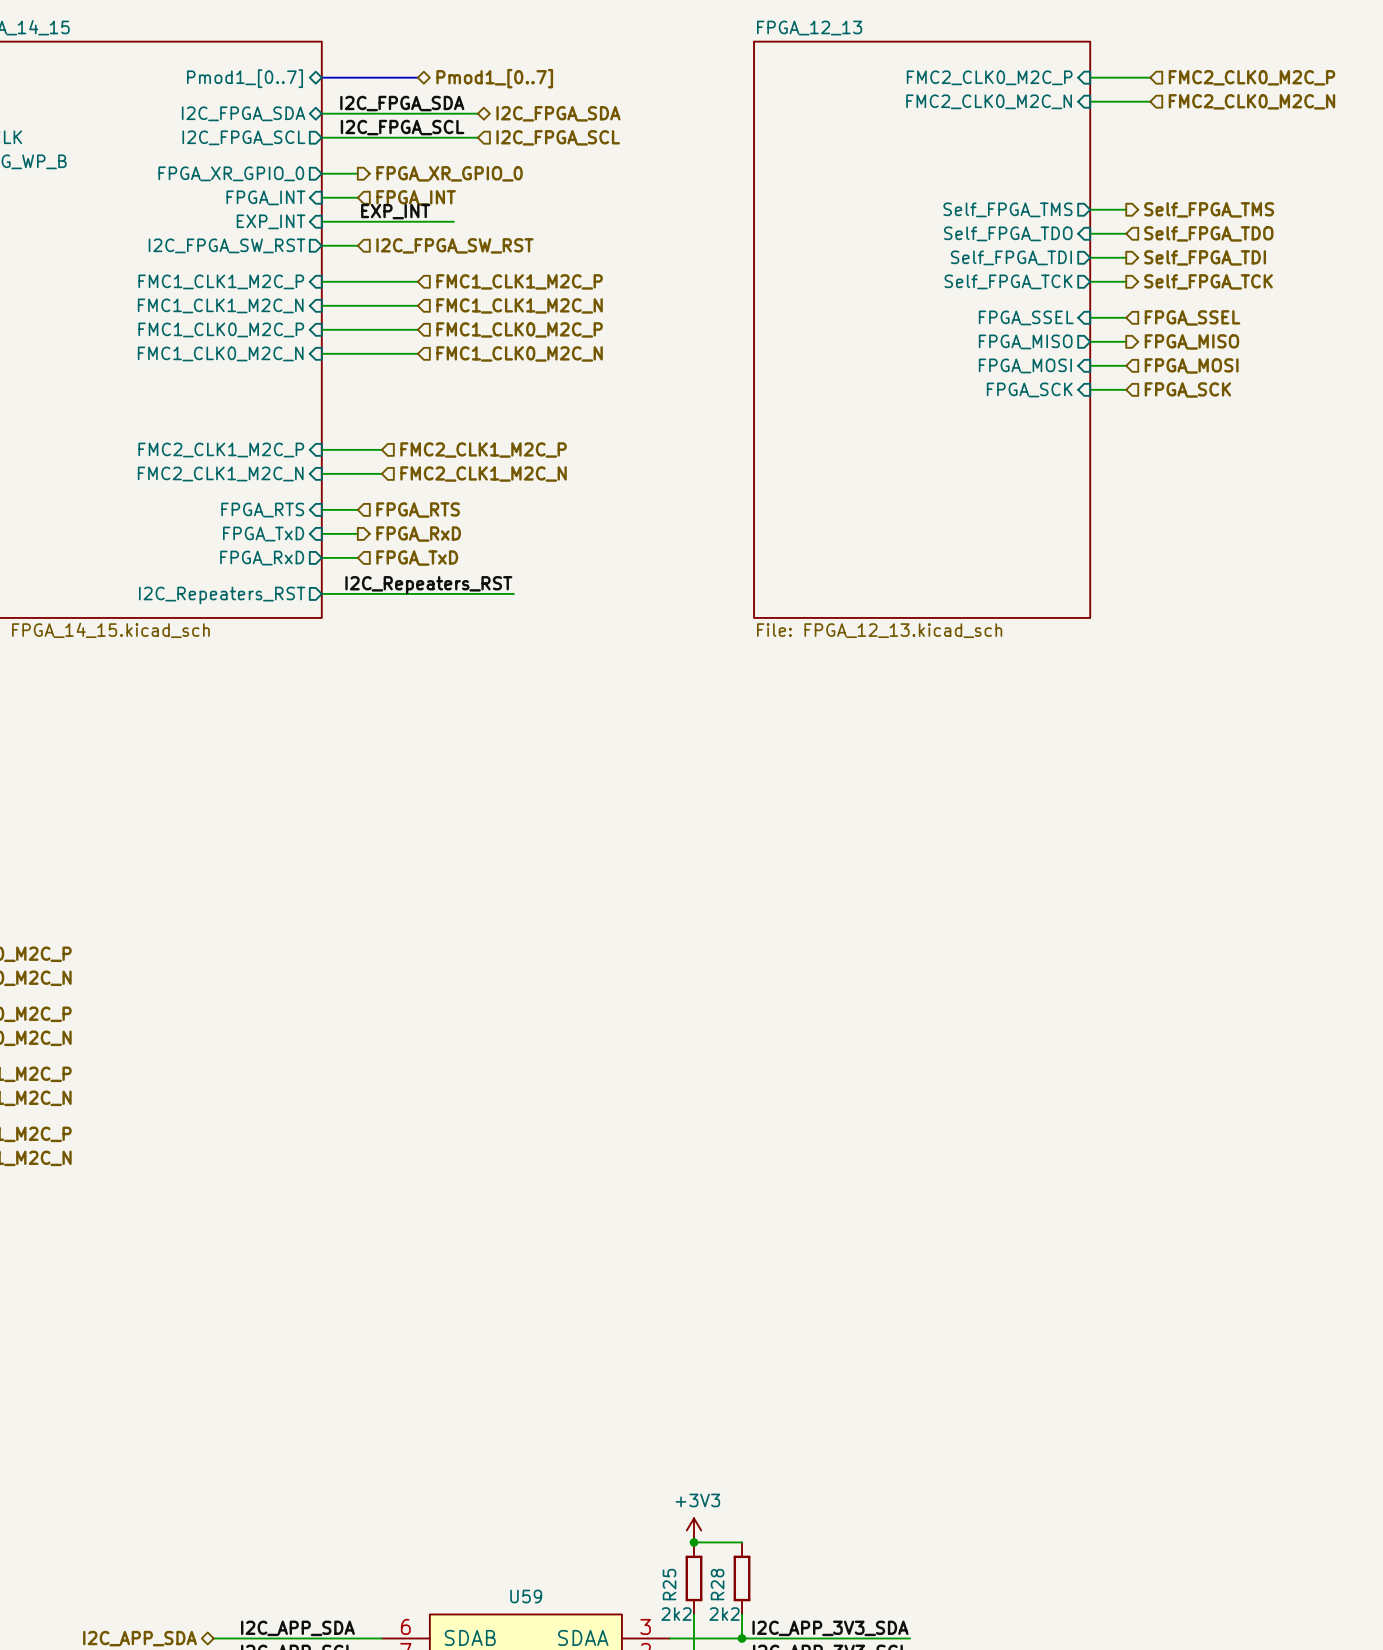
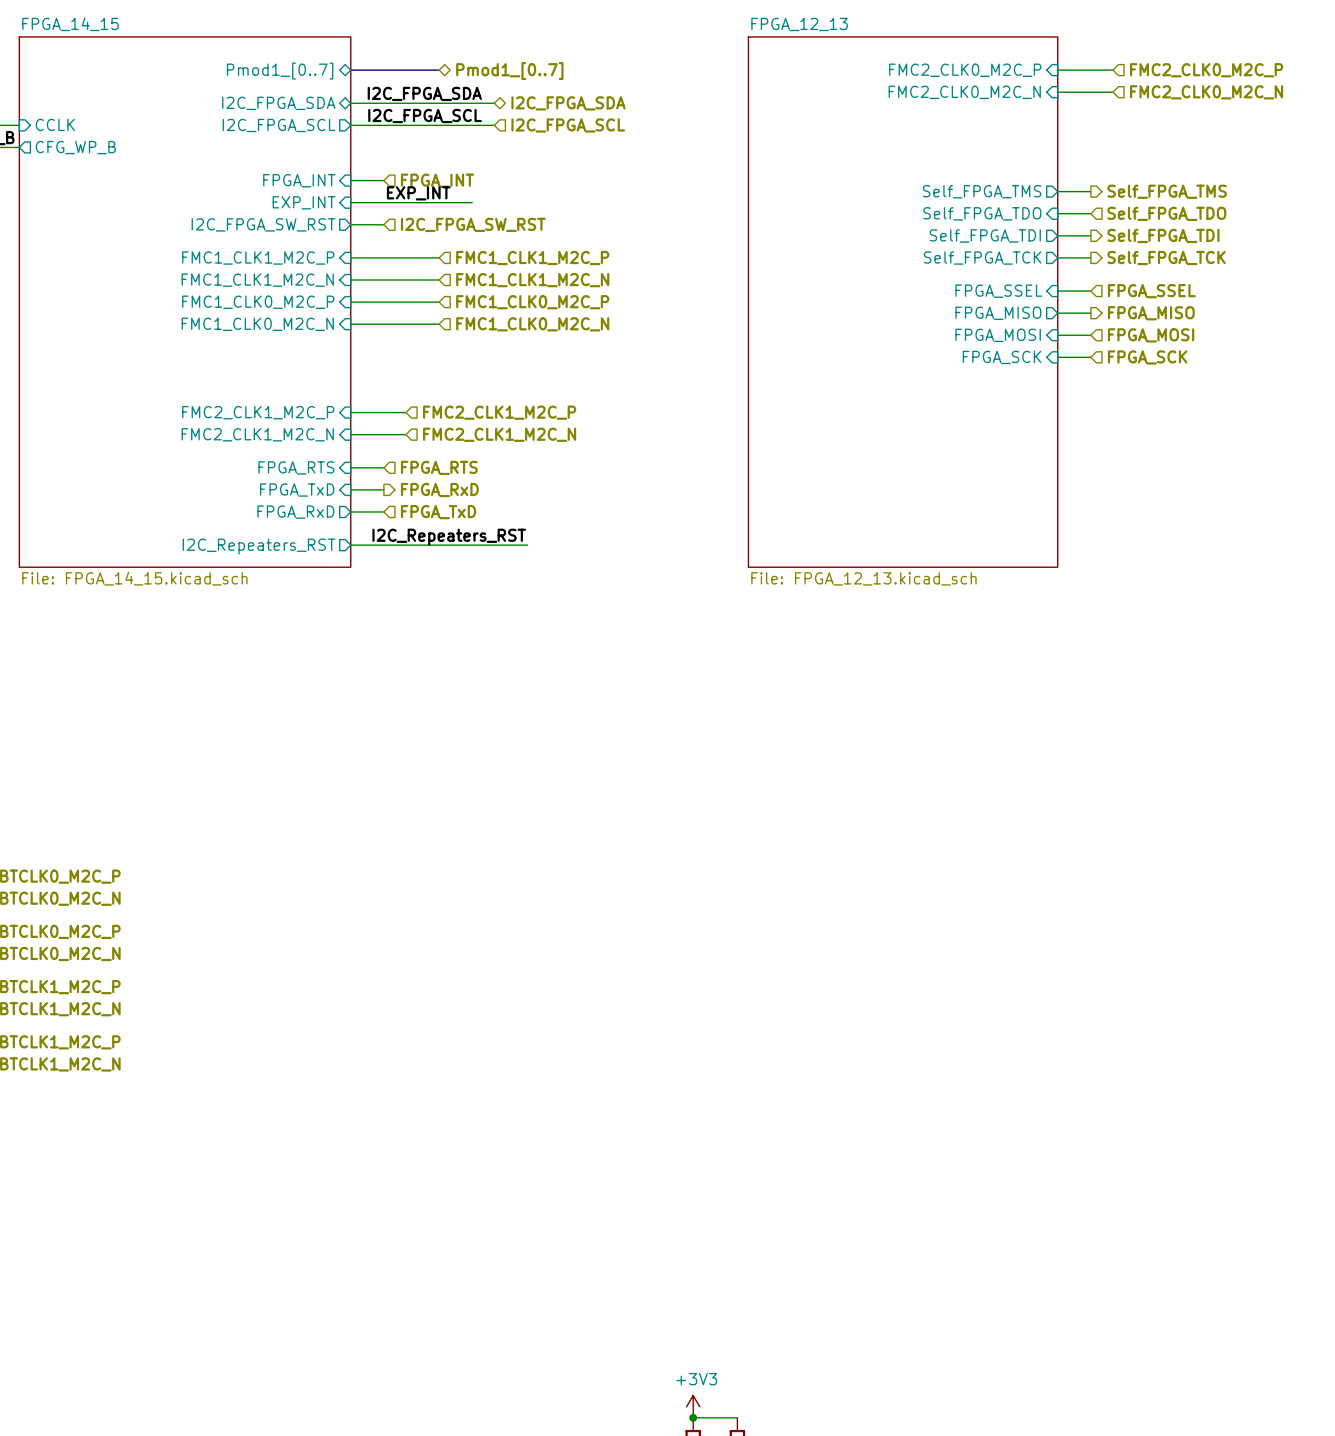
sheet pin: FPGA_XR_GPIO_0 (231, 173) -> none
wire: (321, 173) (357, 173) -> none
hierarchical label: FPGA_XR_GPIO_0 (449, 173) -> none

